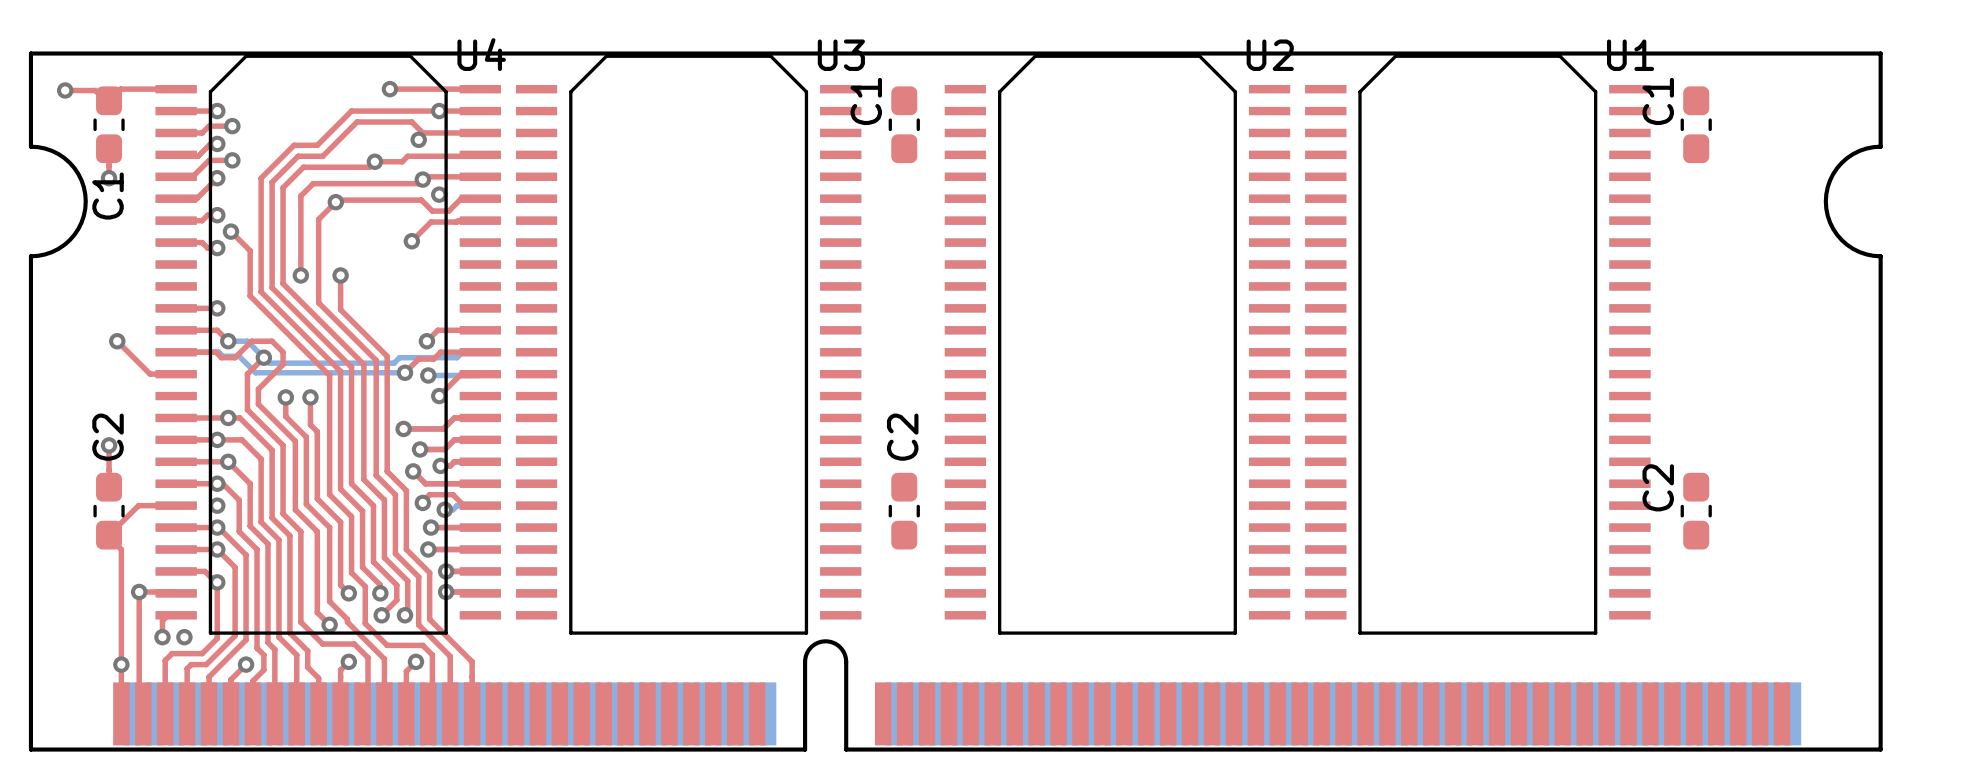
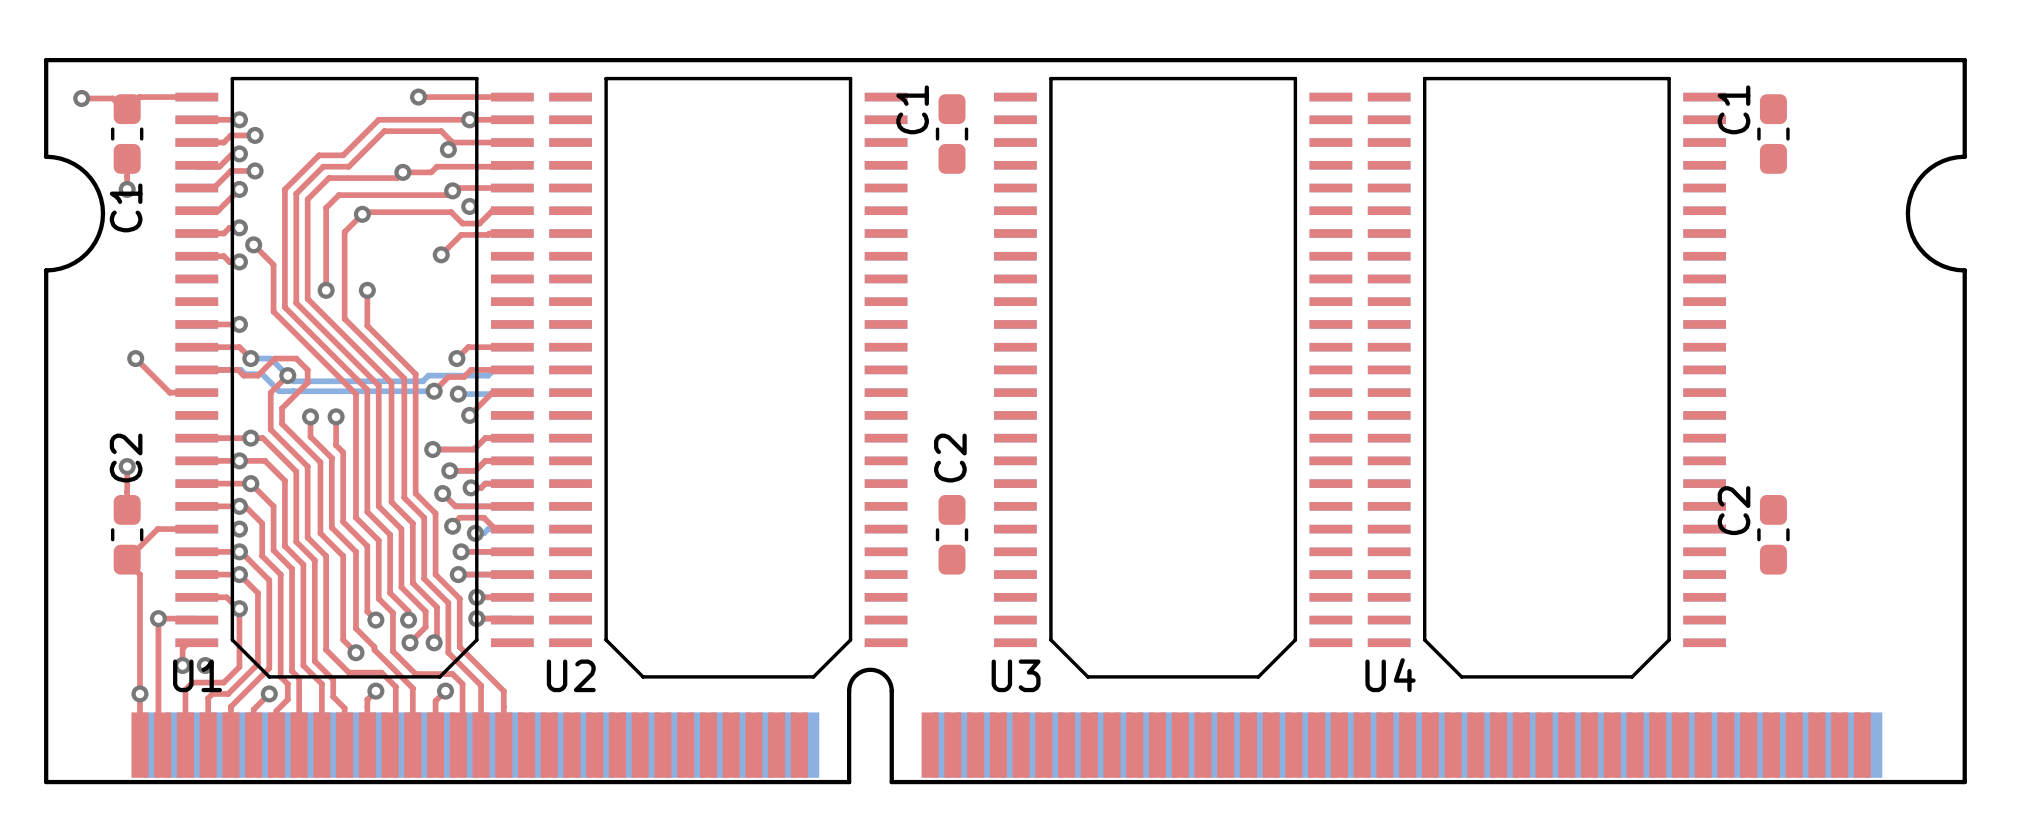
U4 rotation: 0° (328, 344) -> 180° (1546, 377)
U4 position: (328, 344) -> (1546, 377)
U3 rotation: 0° (688, 344) -> 180° (1173, 377)
U3 position: (688, 344) -> (1173, 377)
U2 rotation: 0° (1117, 344) -> 180° (728, 377)
U2 position: (1117, 344) -> (728, 377)
U1 rotation: 0° (1477, 344) -> 180° (354, 377)
U1 position: (1477, 344) -> (354, 377)

